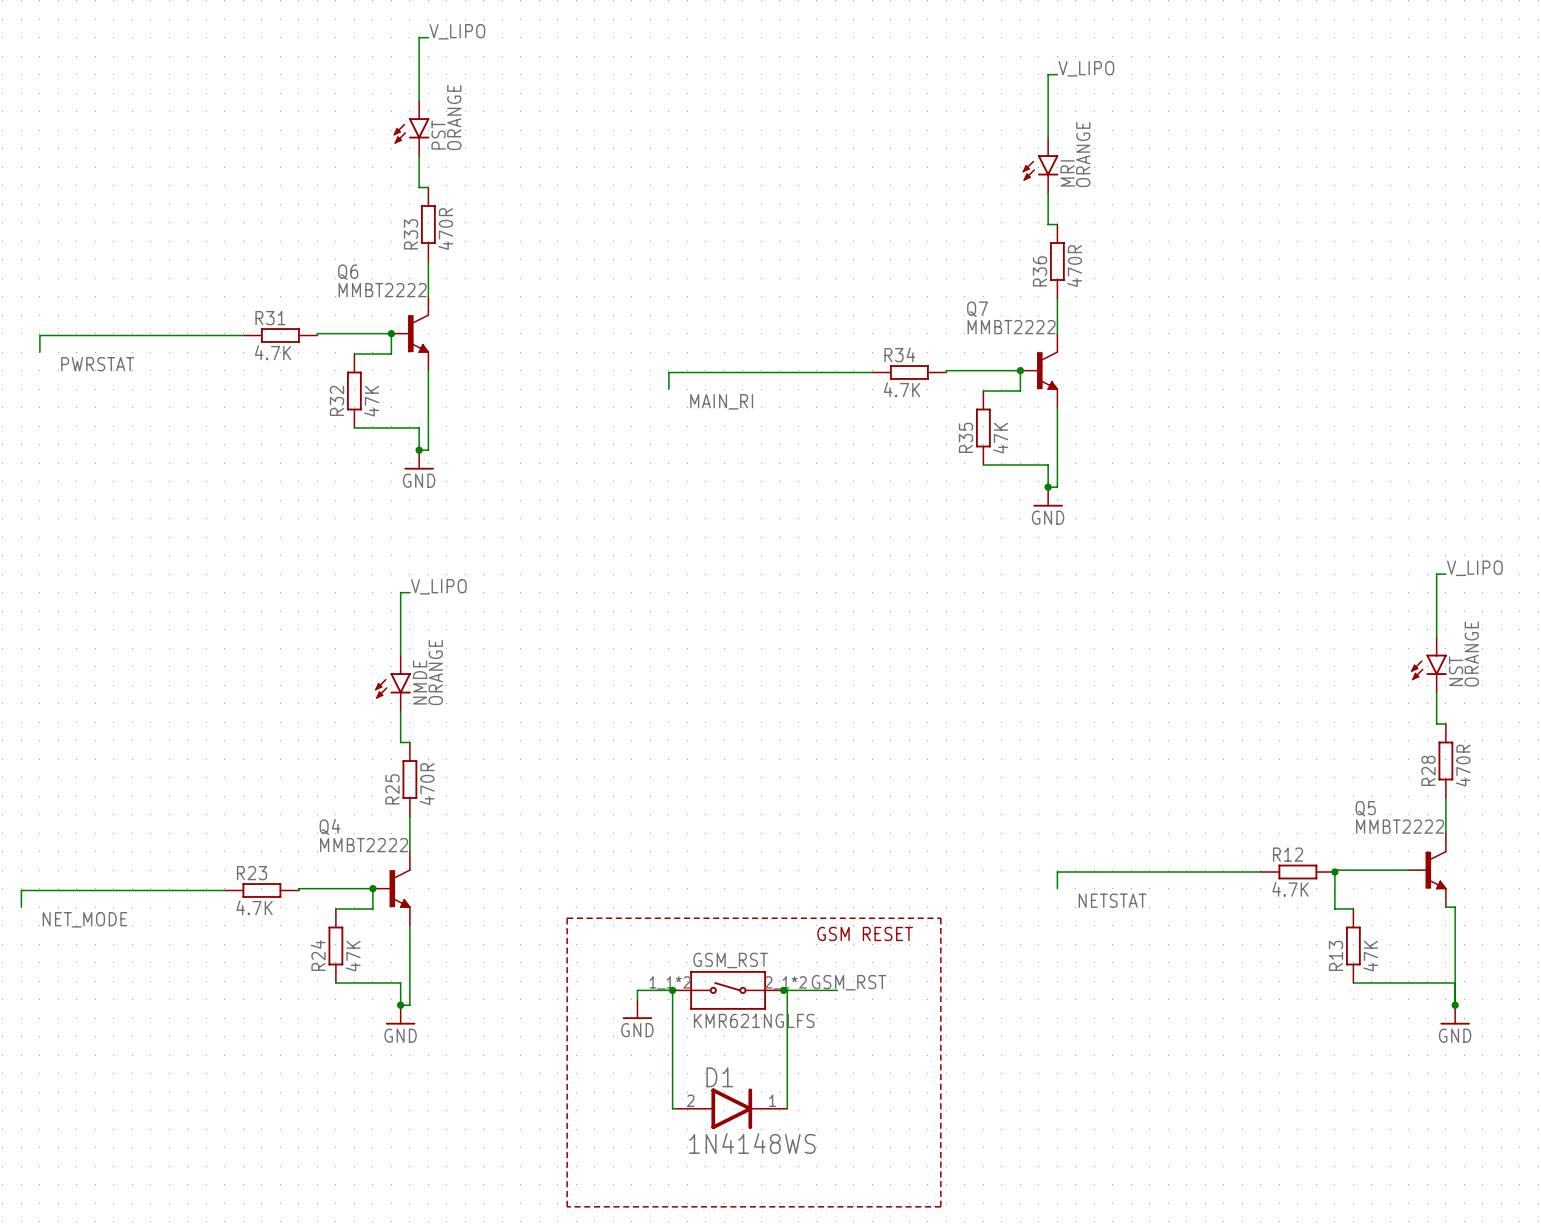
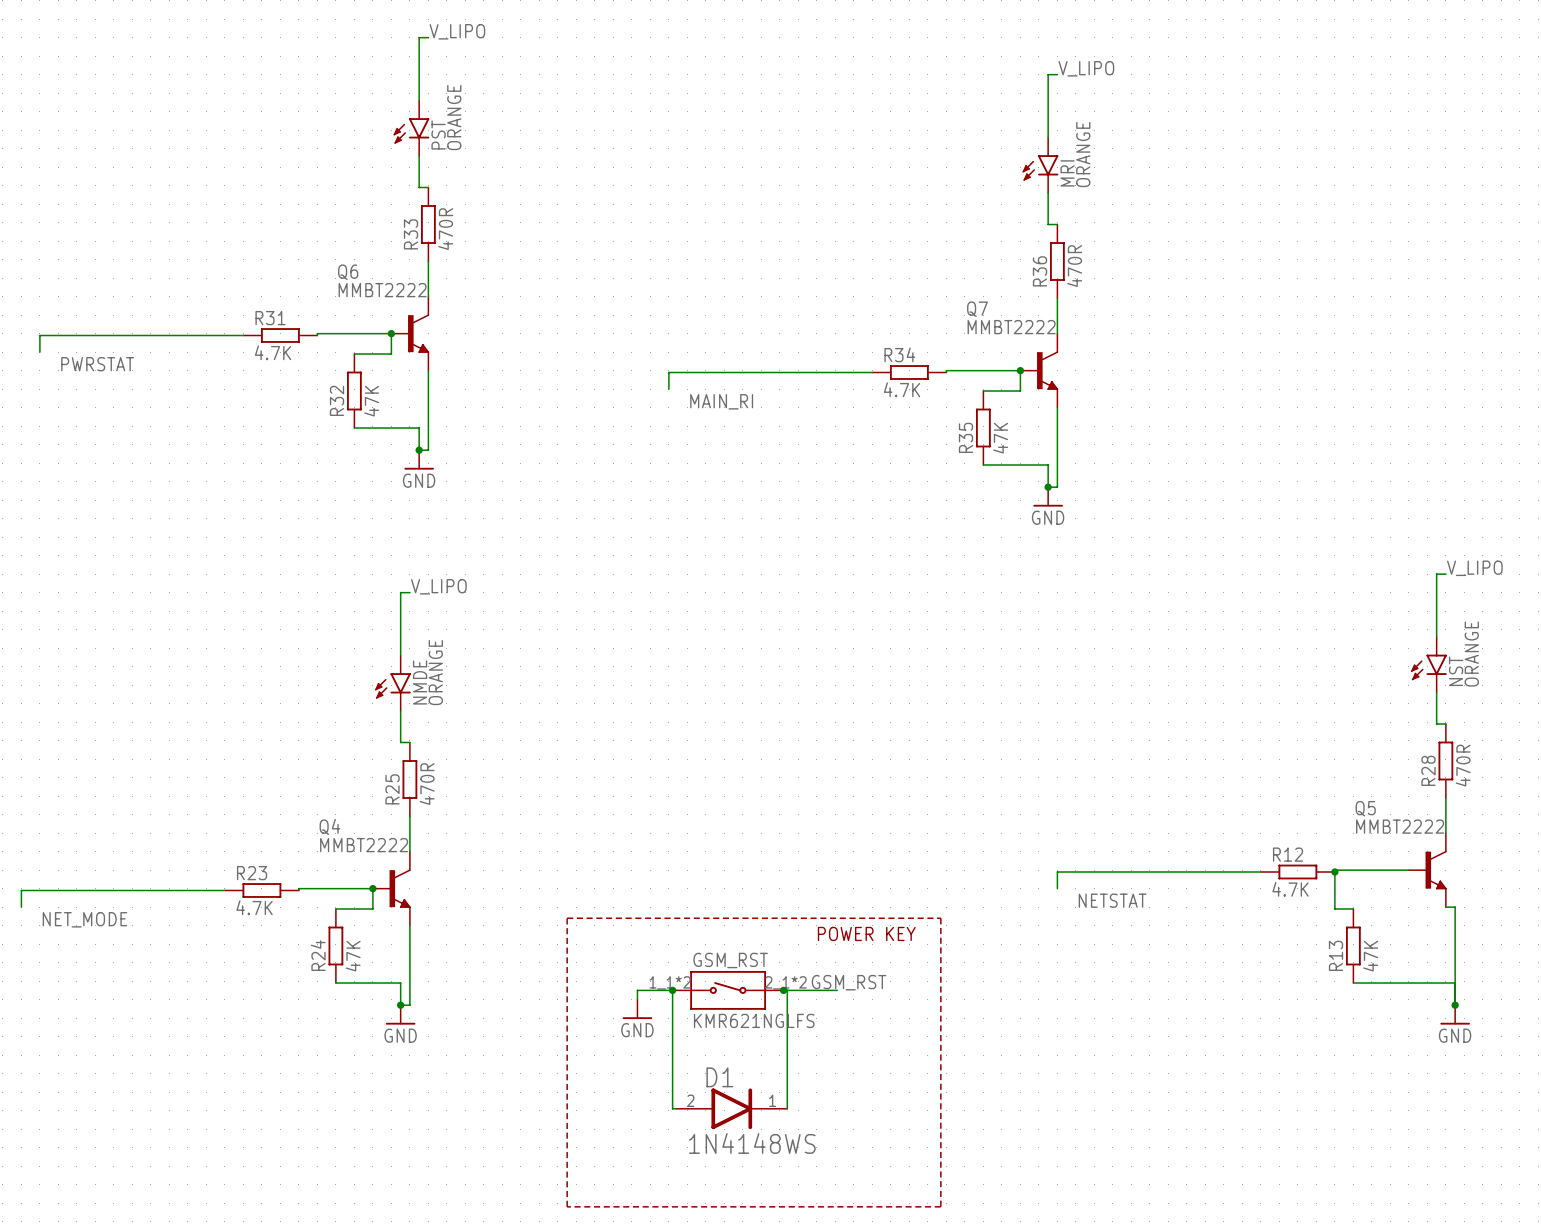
text: GSM RESET (865, 933) -> POWER KEY (866, 933)

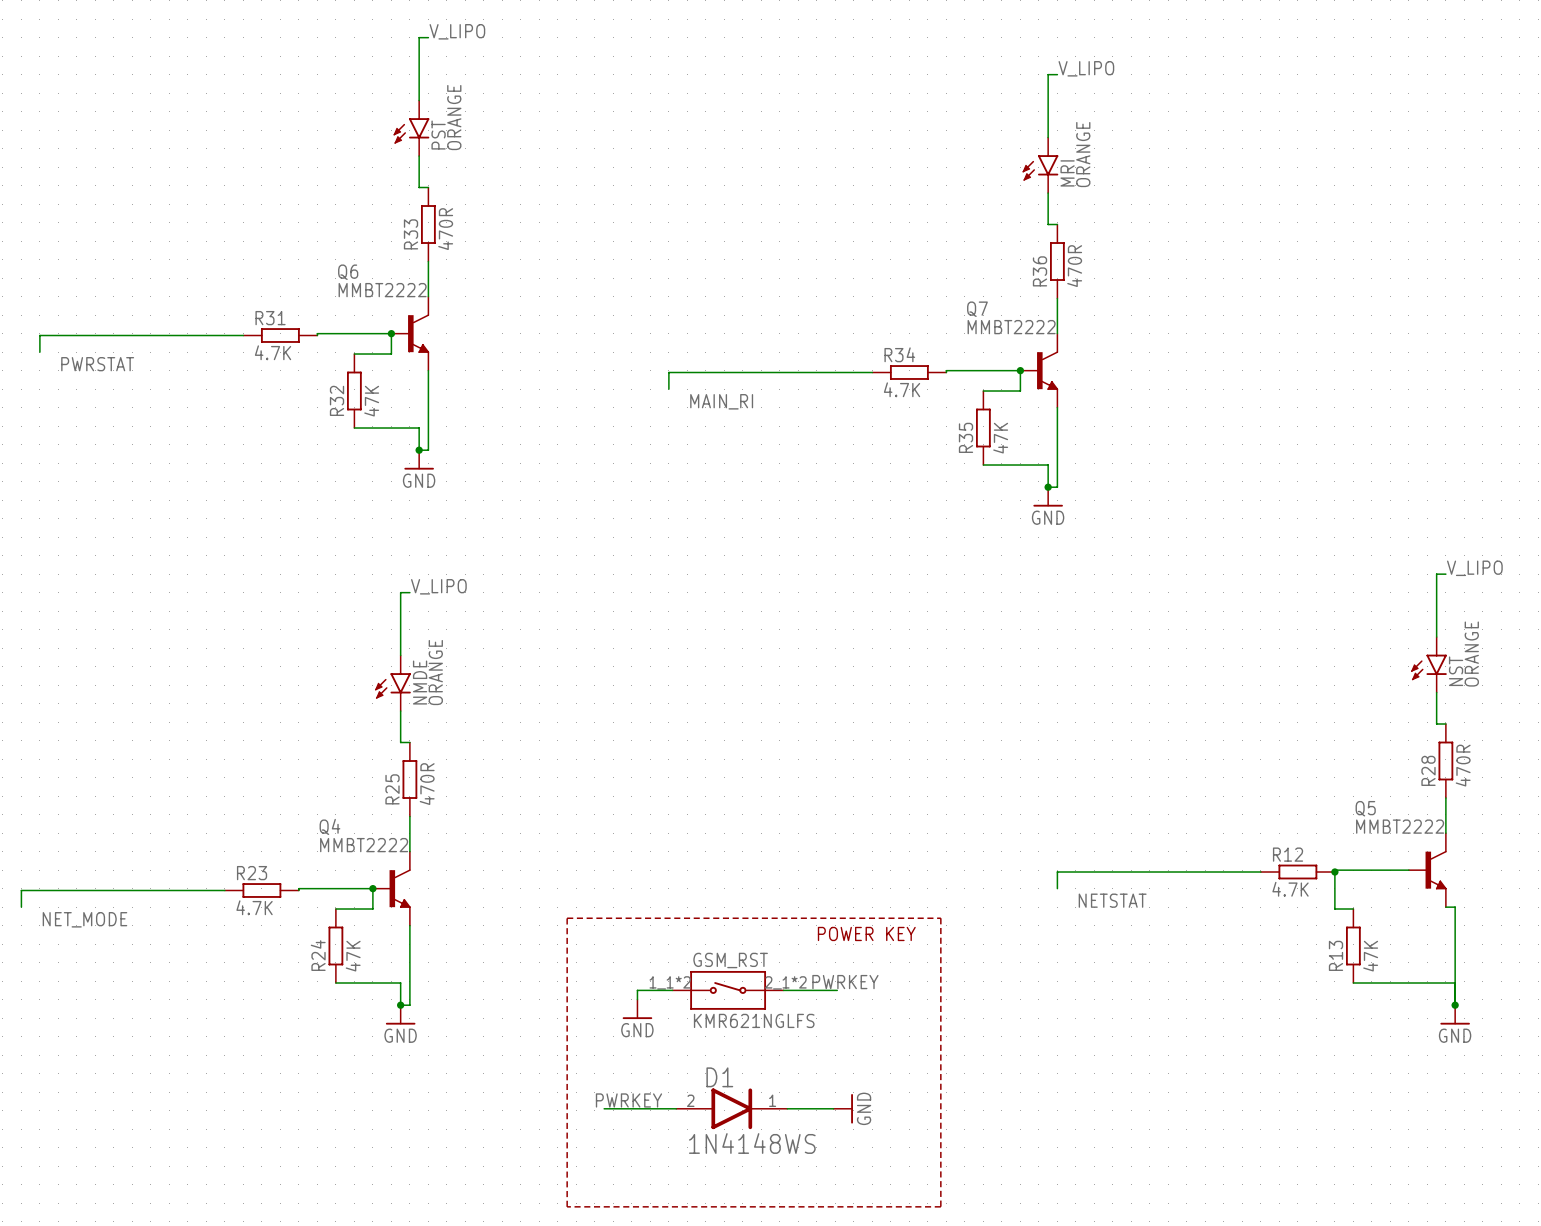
label: GSM_RST (849, 982) -> PWRKEY (845, 982)
wire: (672, 990) (672, 1108) -> (604, 1108) (672, 1108)
junction: (672, 990) -> none
junction: (783, 990) -> none
wire: (787, 990) (787, 1108) -> (833, 1108) (787, 1108)
label: none -> PWRKEY (628, 1100)
power symbol: none -> GND (843, 1108)

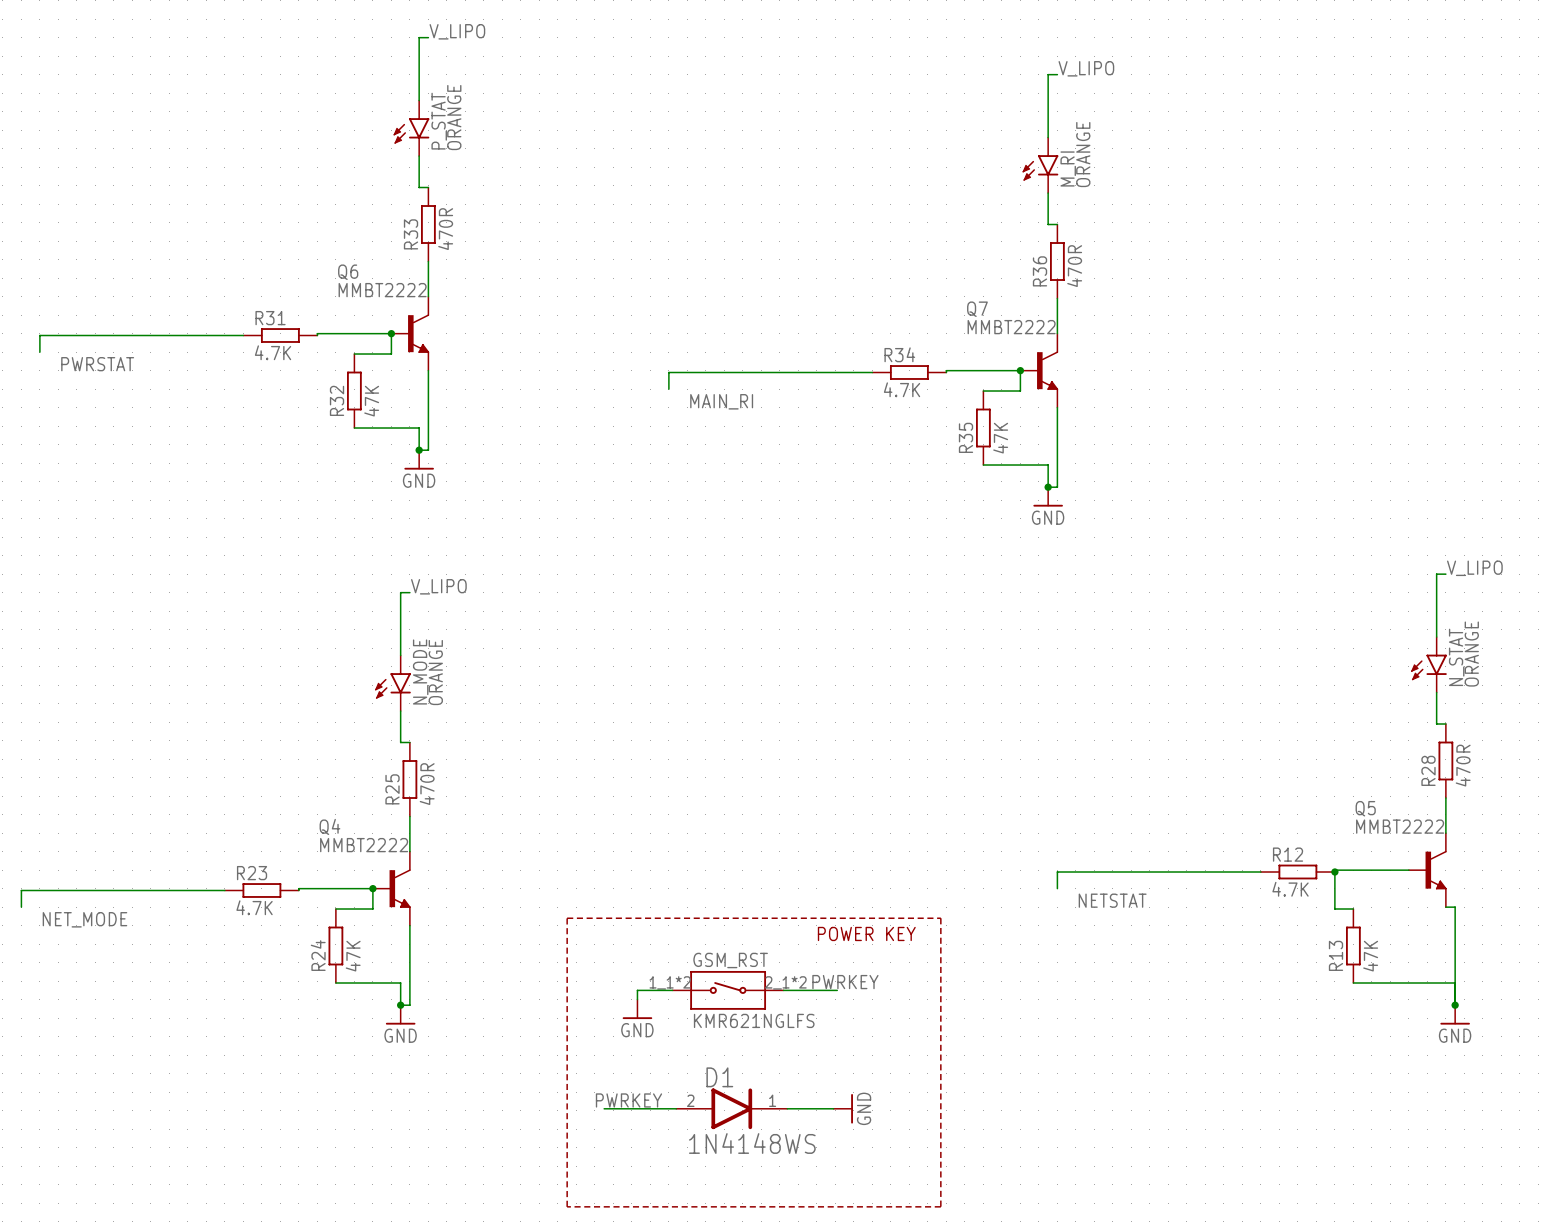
PST name: PST (438, 135) -> P_STAT (439, 121)
MRI name: MRI (1067, 173) -> M_RI (1068, 168)
NST name: NST (1456, 671) -> N_STAT (1456, 657)
NMDE name: NMDE (420, 682) -> N_MODE (420, 671)

